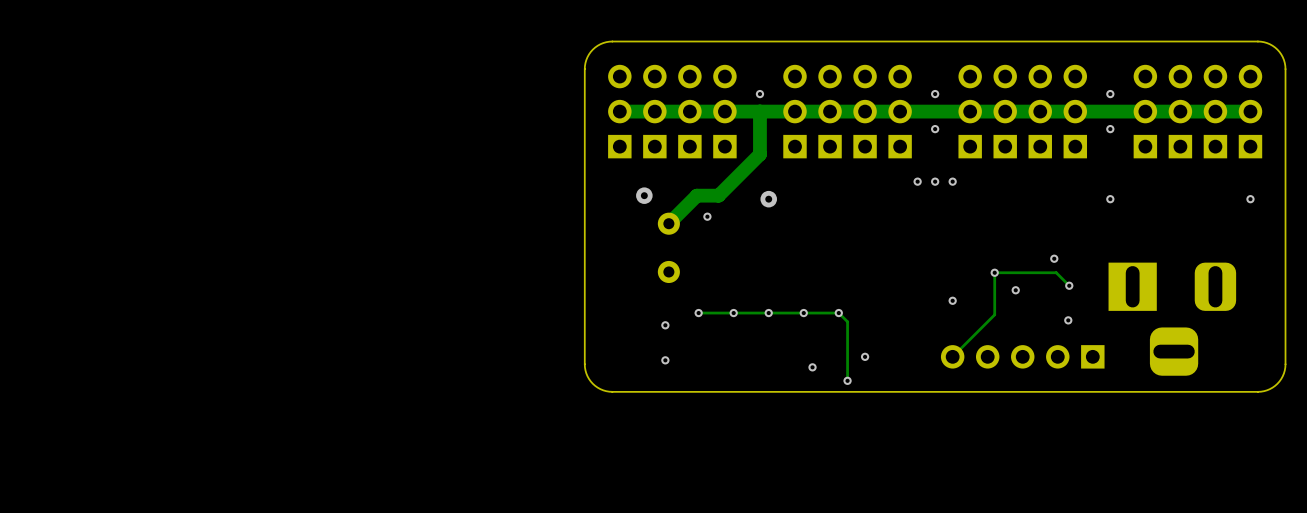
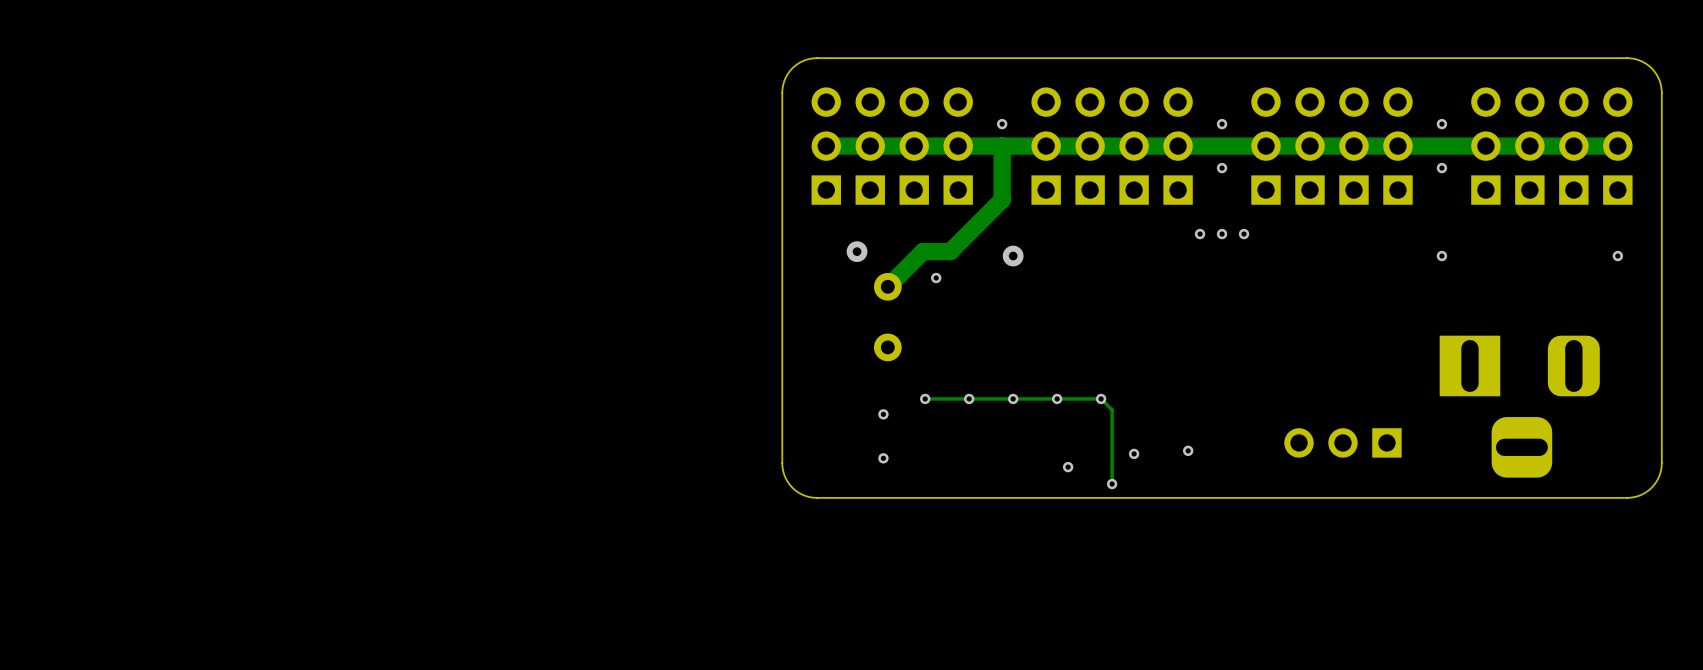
via: (1054, 258) -> none
via: (994, 272) -> none
track: (1069, 285) (1056, 272) (994, 272) (994, 314) (952, 356) -> none
via: (1069, 285) -> none
via: (1015, 290) -> none
via: (952, 300) -> none
via: (1068, 320) -> none
part footprint: [940, 345, 1105, 369] -> [1284, 428, 1402, 458]
via: none -> (1188, 450)

